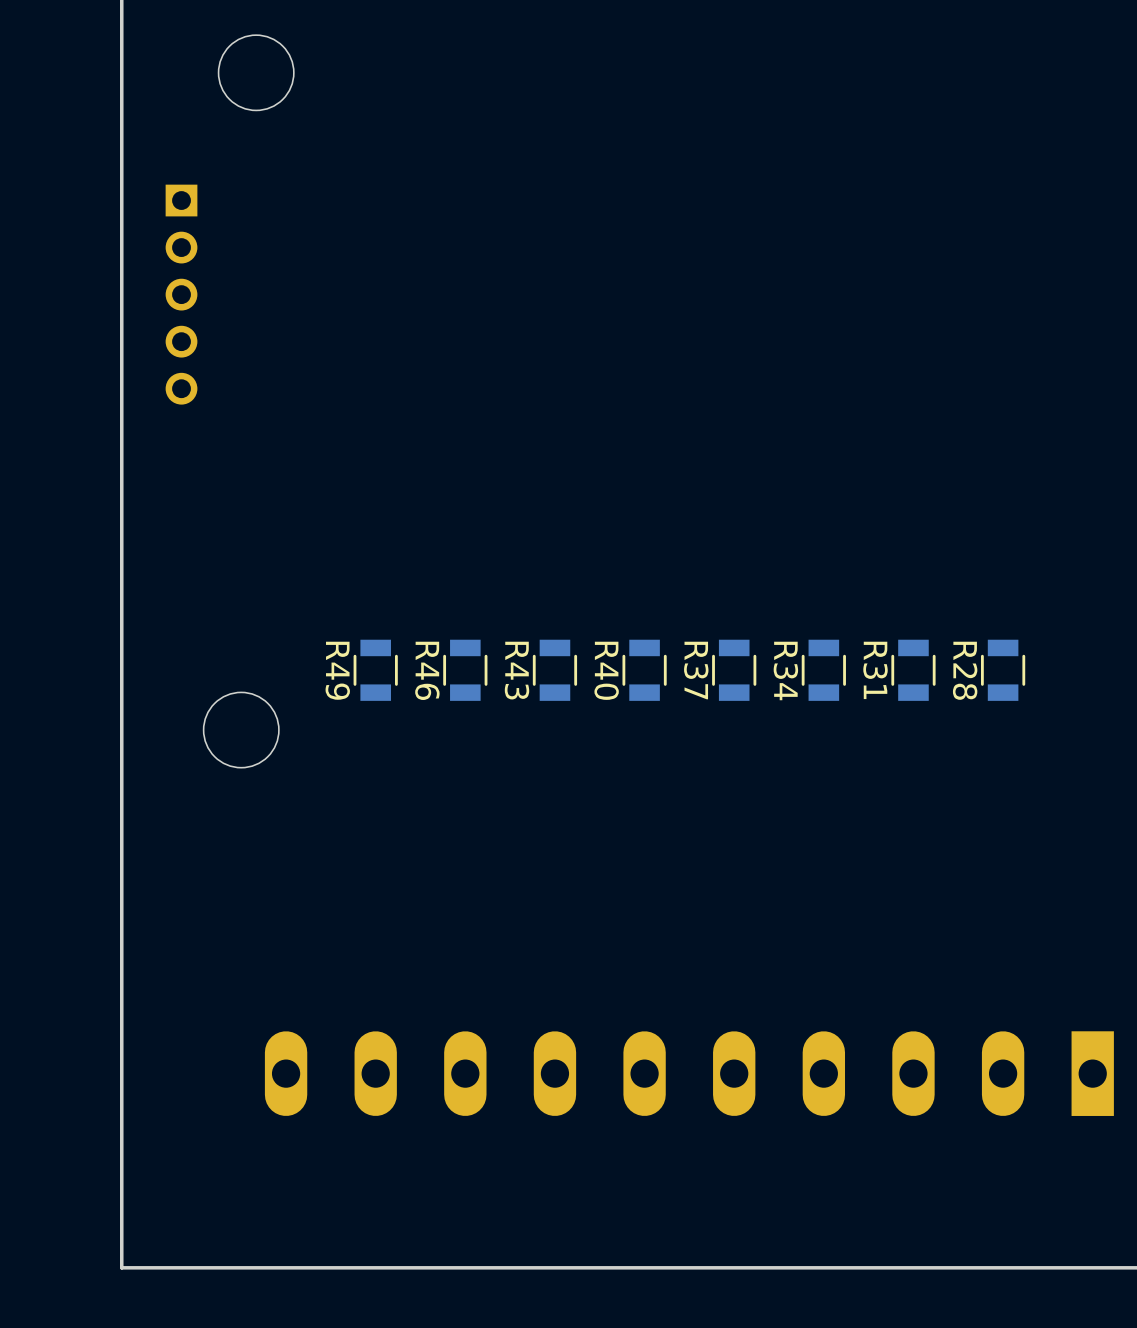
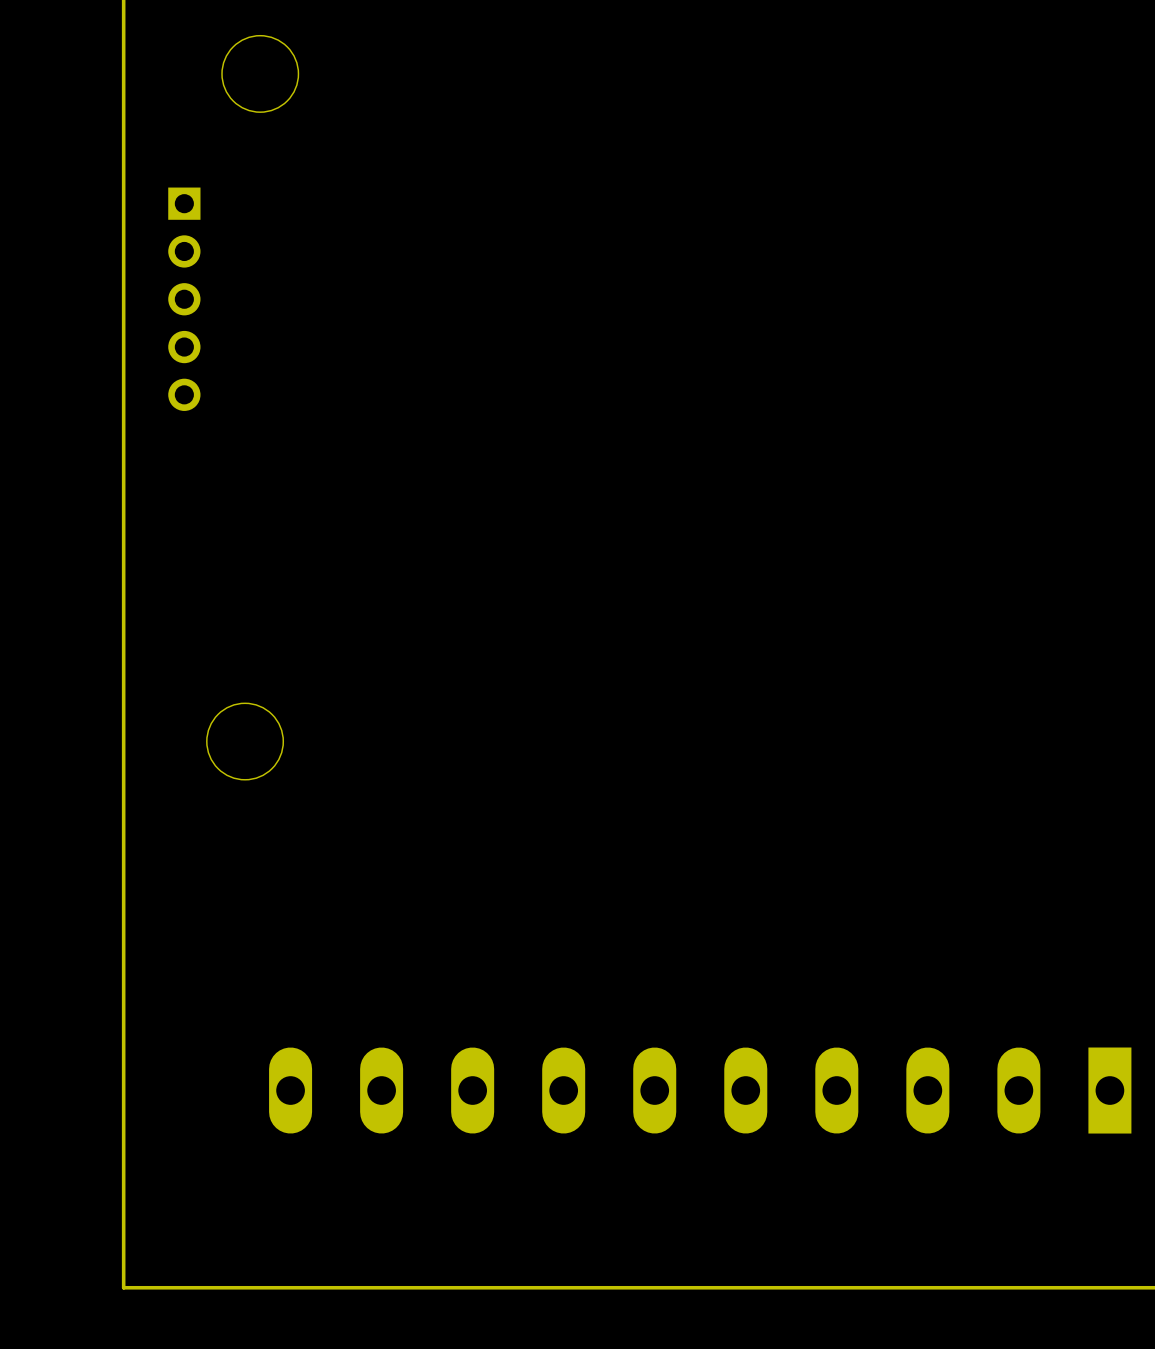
R49: (375, 670) -> none
R46: (465, 670) -> none
R43: (554, 670) -> none
R40: (644, 670) -> none
R37: (734, 670) -> none
R34: (823, 670) -> none
R31: (913, 670) -> none
R28: (1003, 670) -> none

